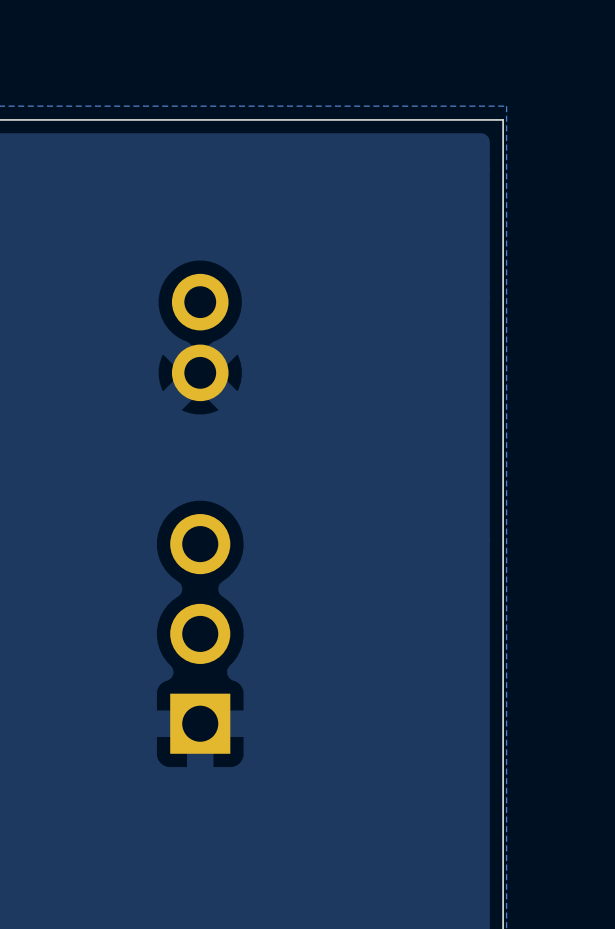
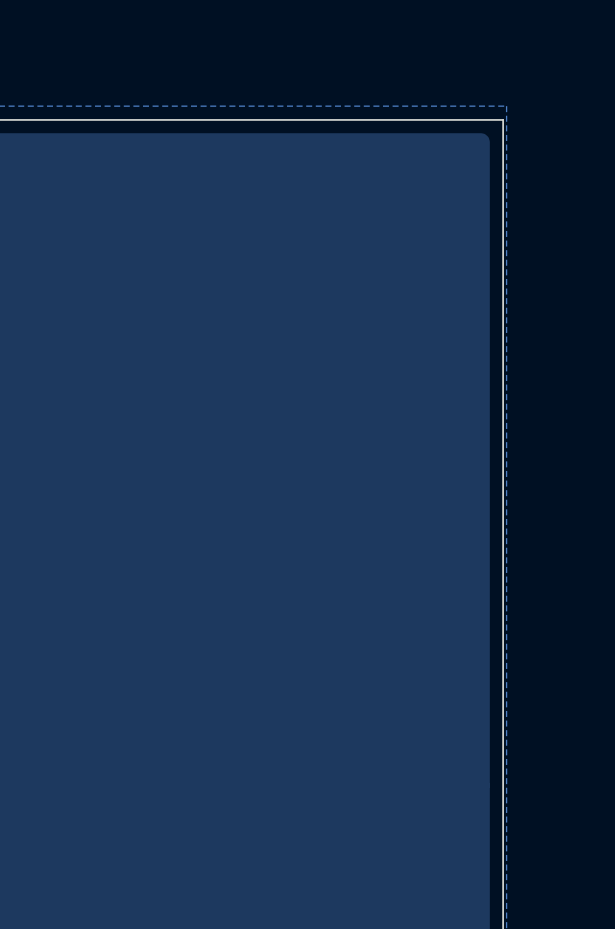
part: (200, 337) -> none
part: (200, 633) -> none

